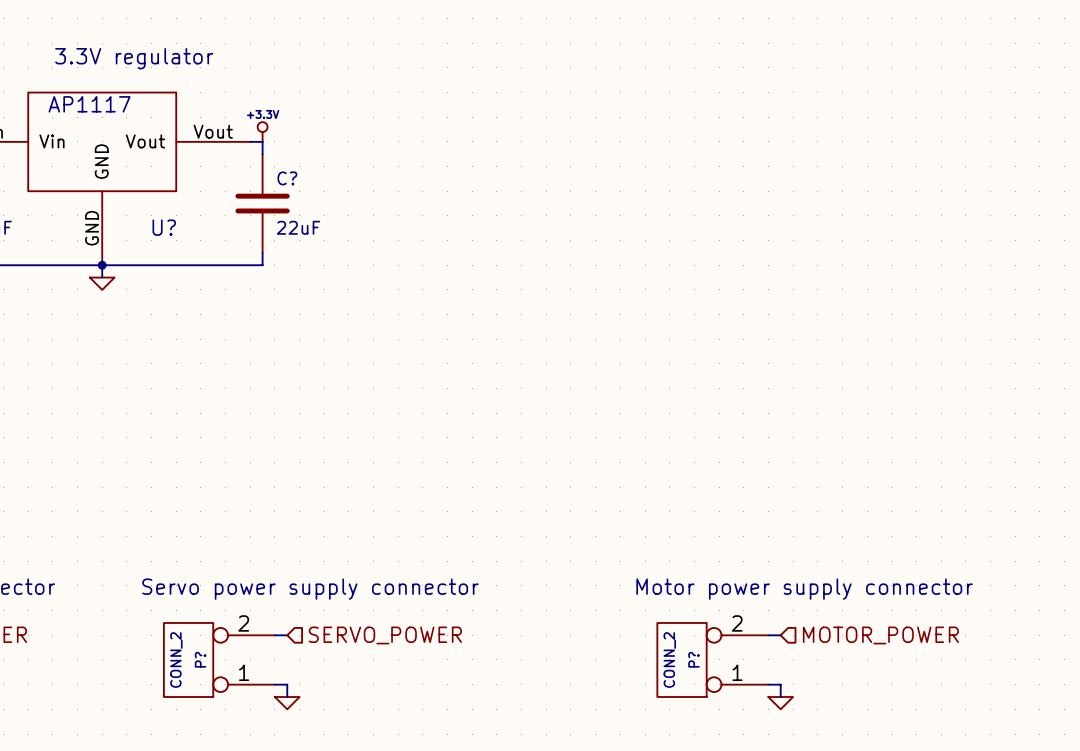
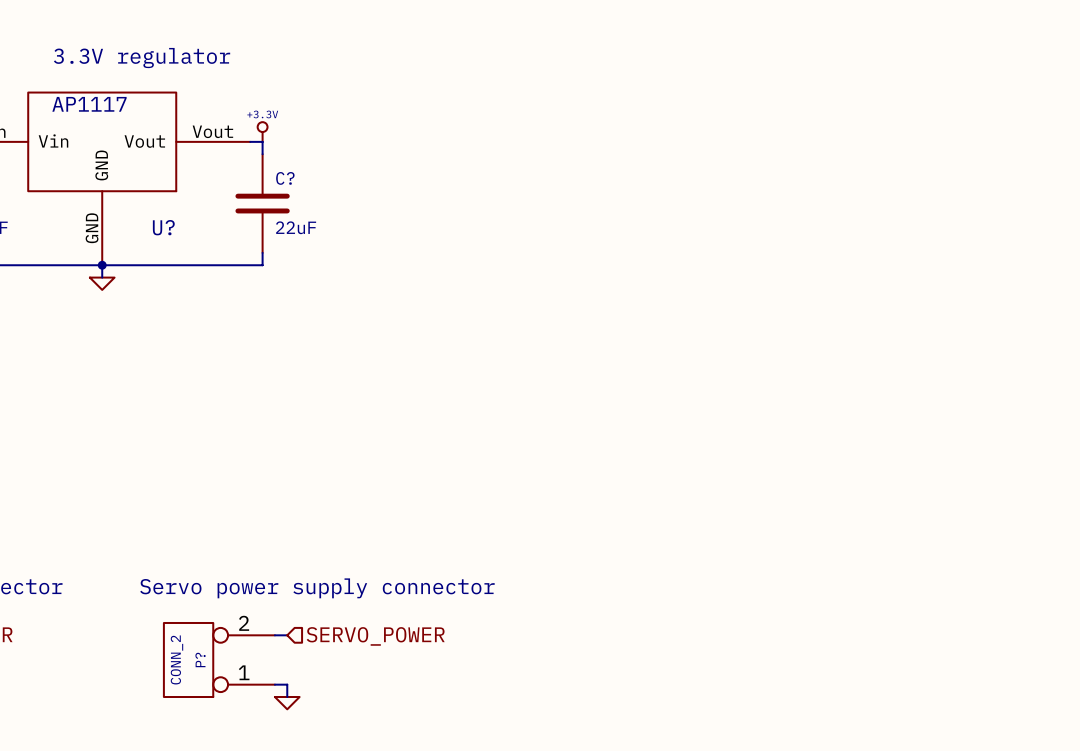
text: Motor power supply connector (804, 589) -> none
wire: (768, 635) (780, 635) -> none
hierarchical label: MOTOR_POWER (880, 635) -> none
P?: CONN_2 (712, 659) -> none
wire: (768, 684) (780, 684) (780, 697) -> none
power symbol: (780, 703) -> none

